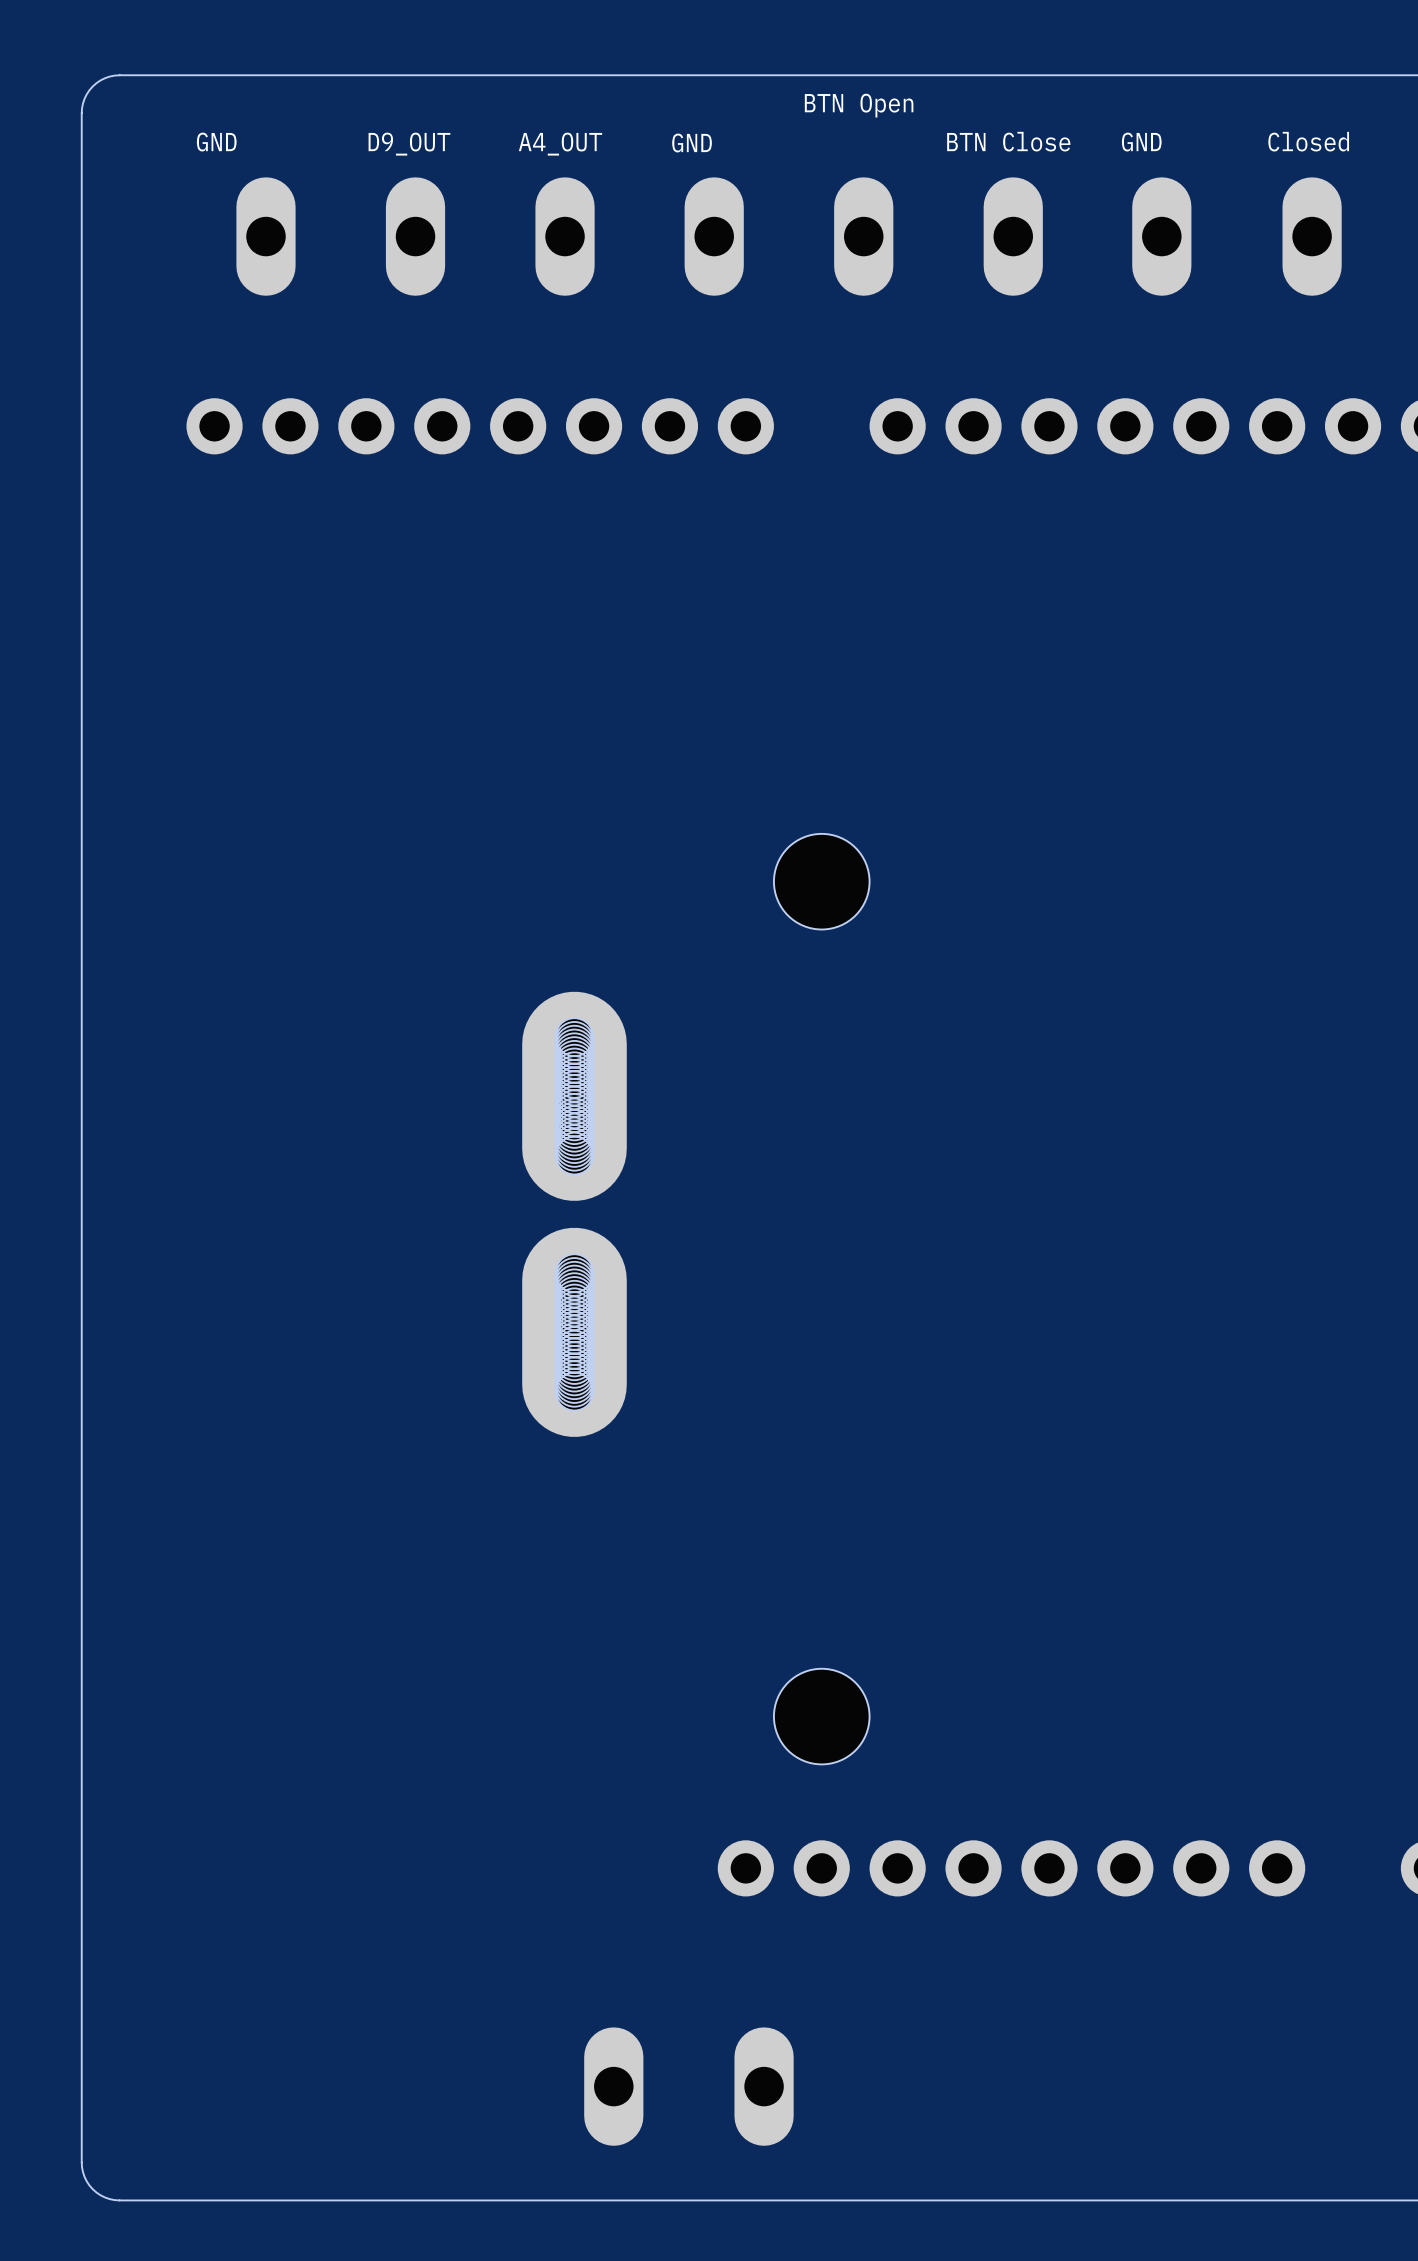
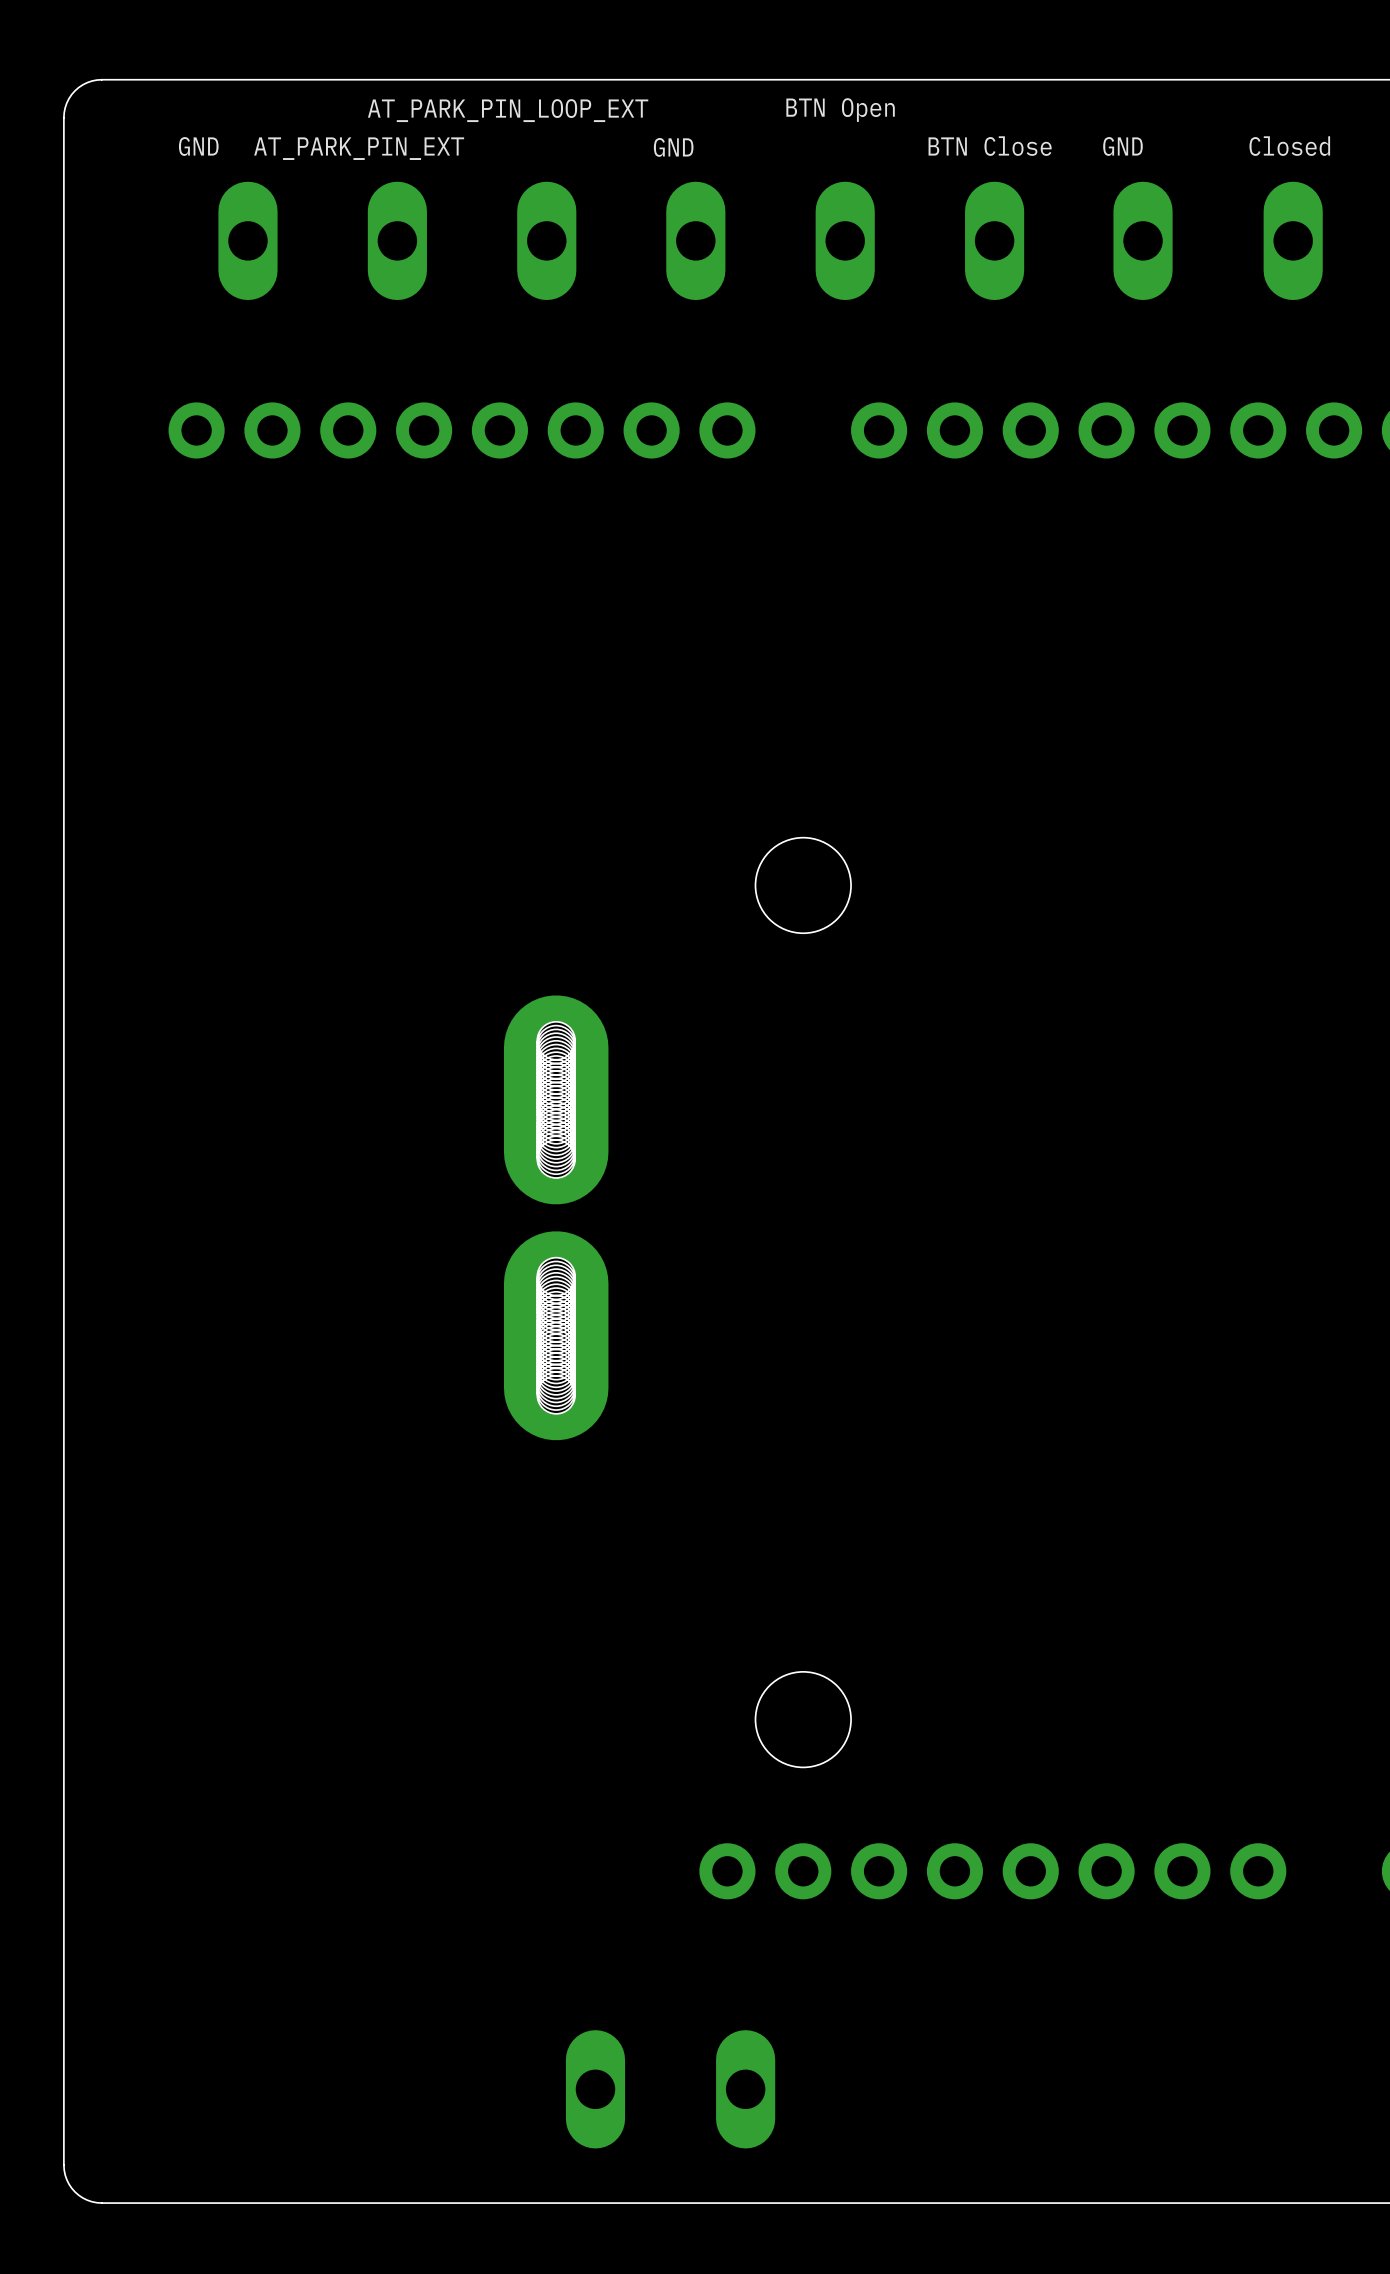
text: none -> AT_PARK_PIN_LOOP_EXT (508, 110)
text: none -> AT_PARK_PIN_EXT (359, 148)
text: D9_OUT (409, 144) -> none
text: A4_OUT (560, 144) -> none

